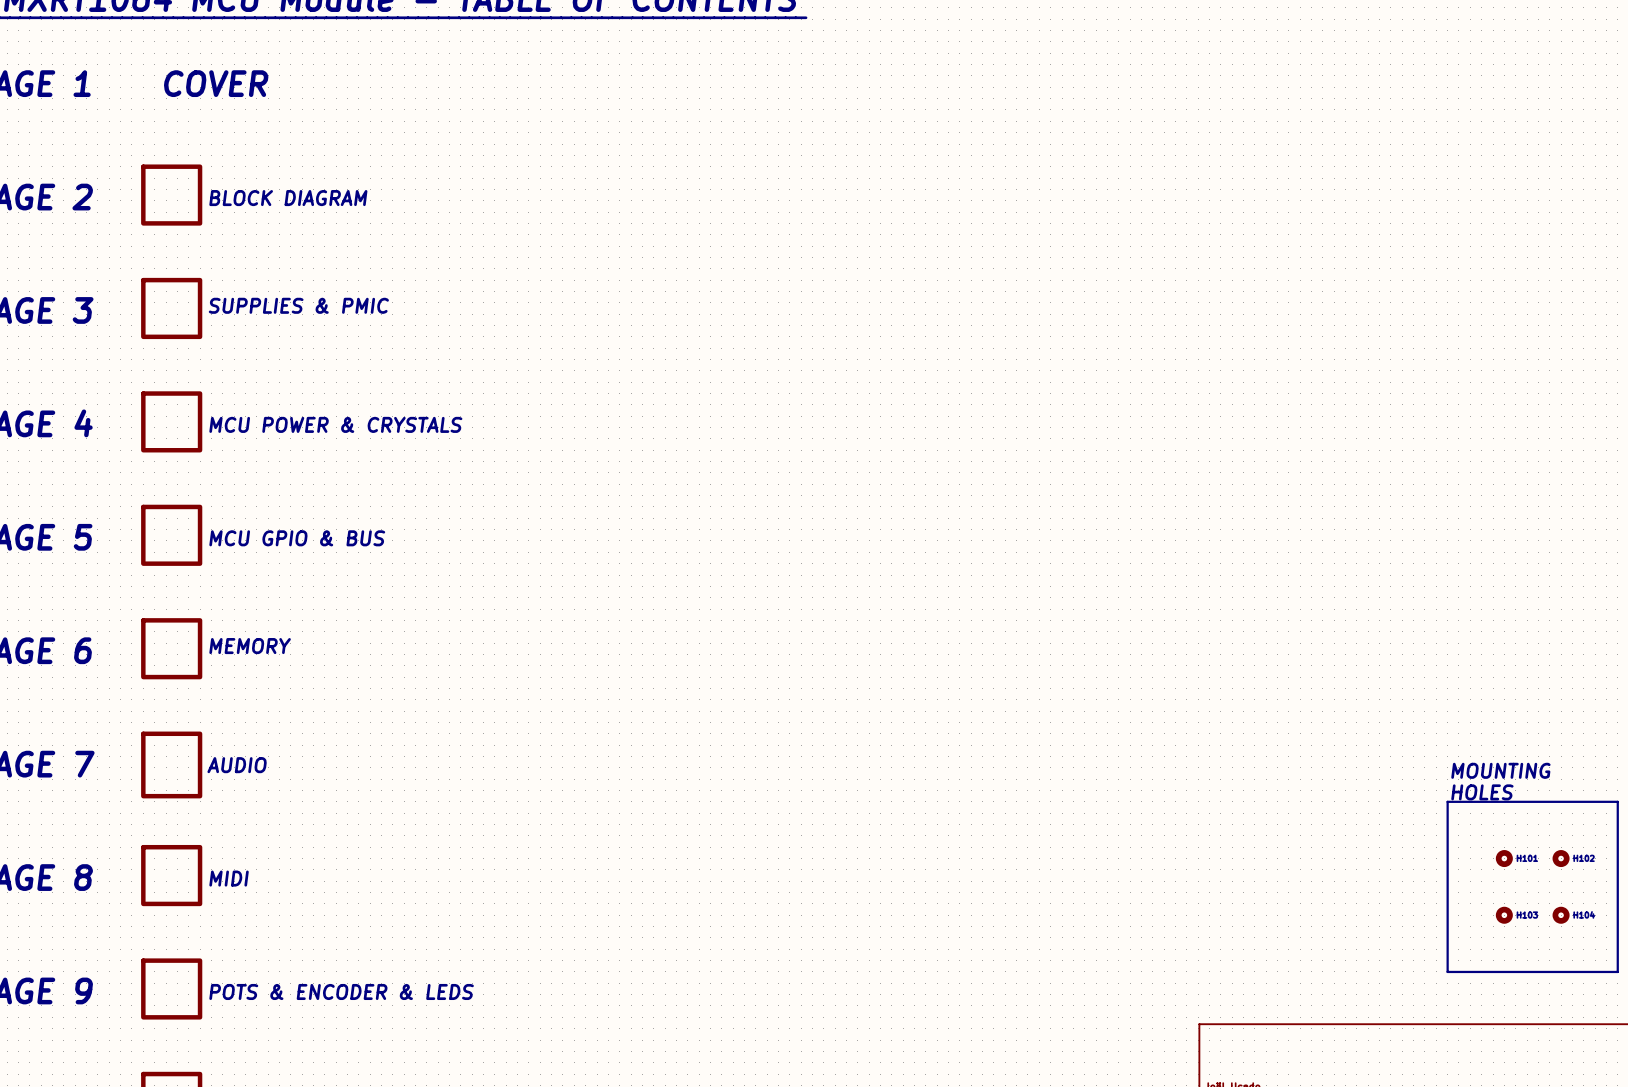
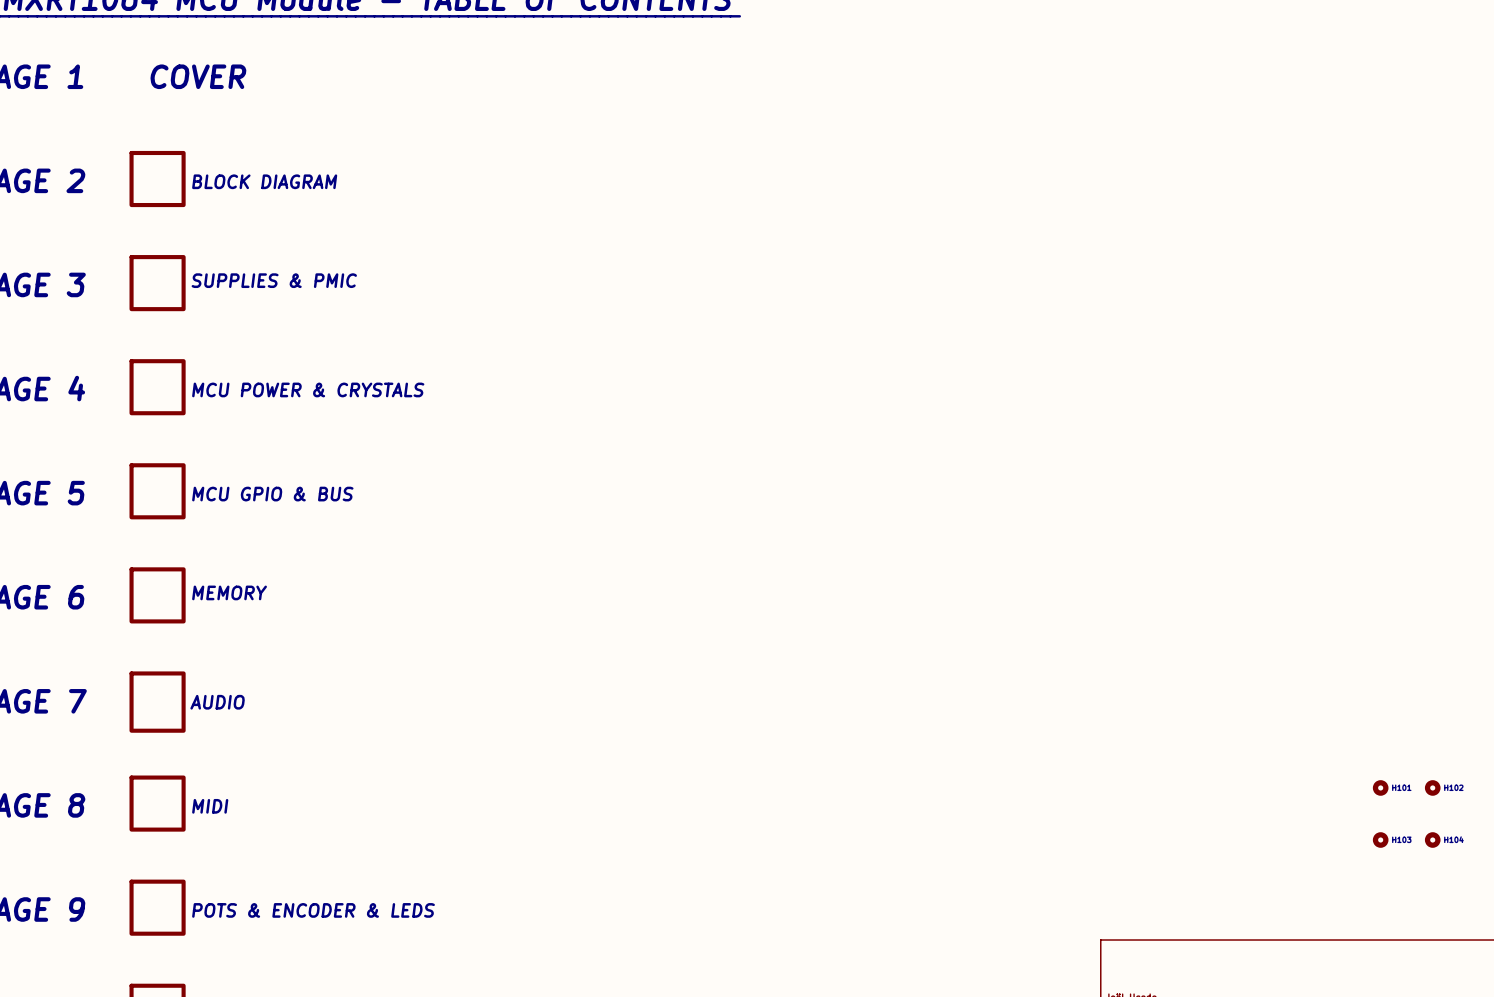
text: MOUNTING (1500, 770) -> none
text: HOLES (1482, 792) -> none
line: (1447, 801) (1447, 971) (1617, 971) (1617, 801) (1447, 801) -> none

